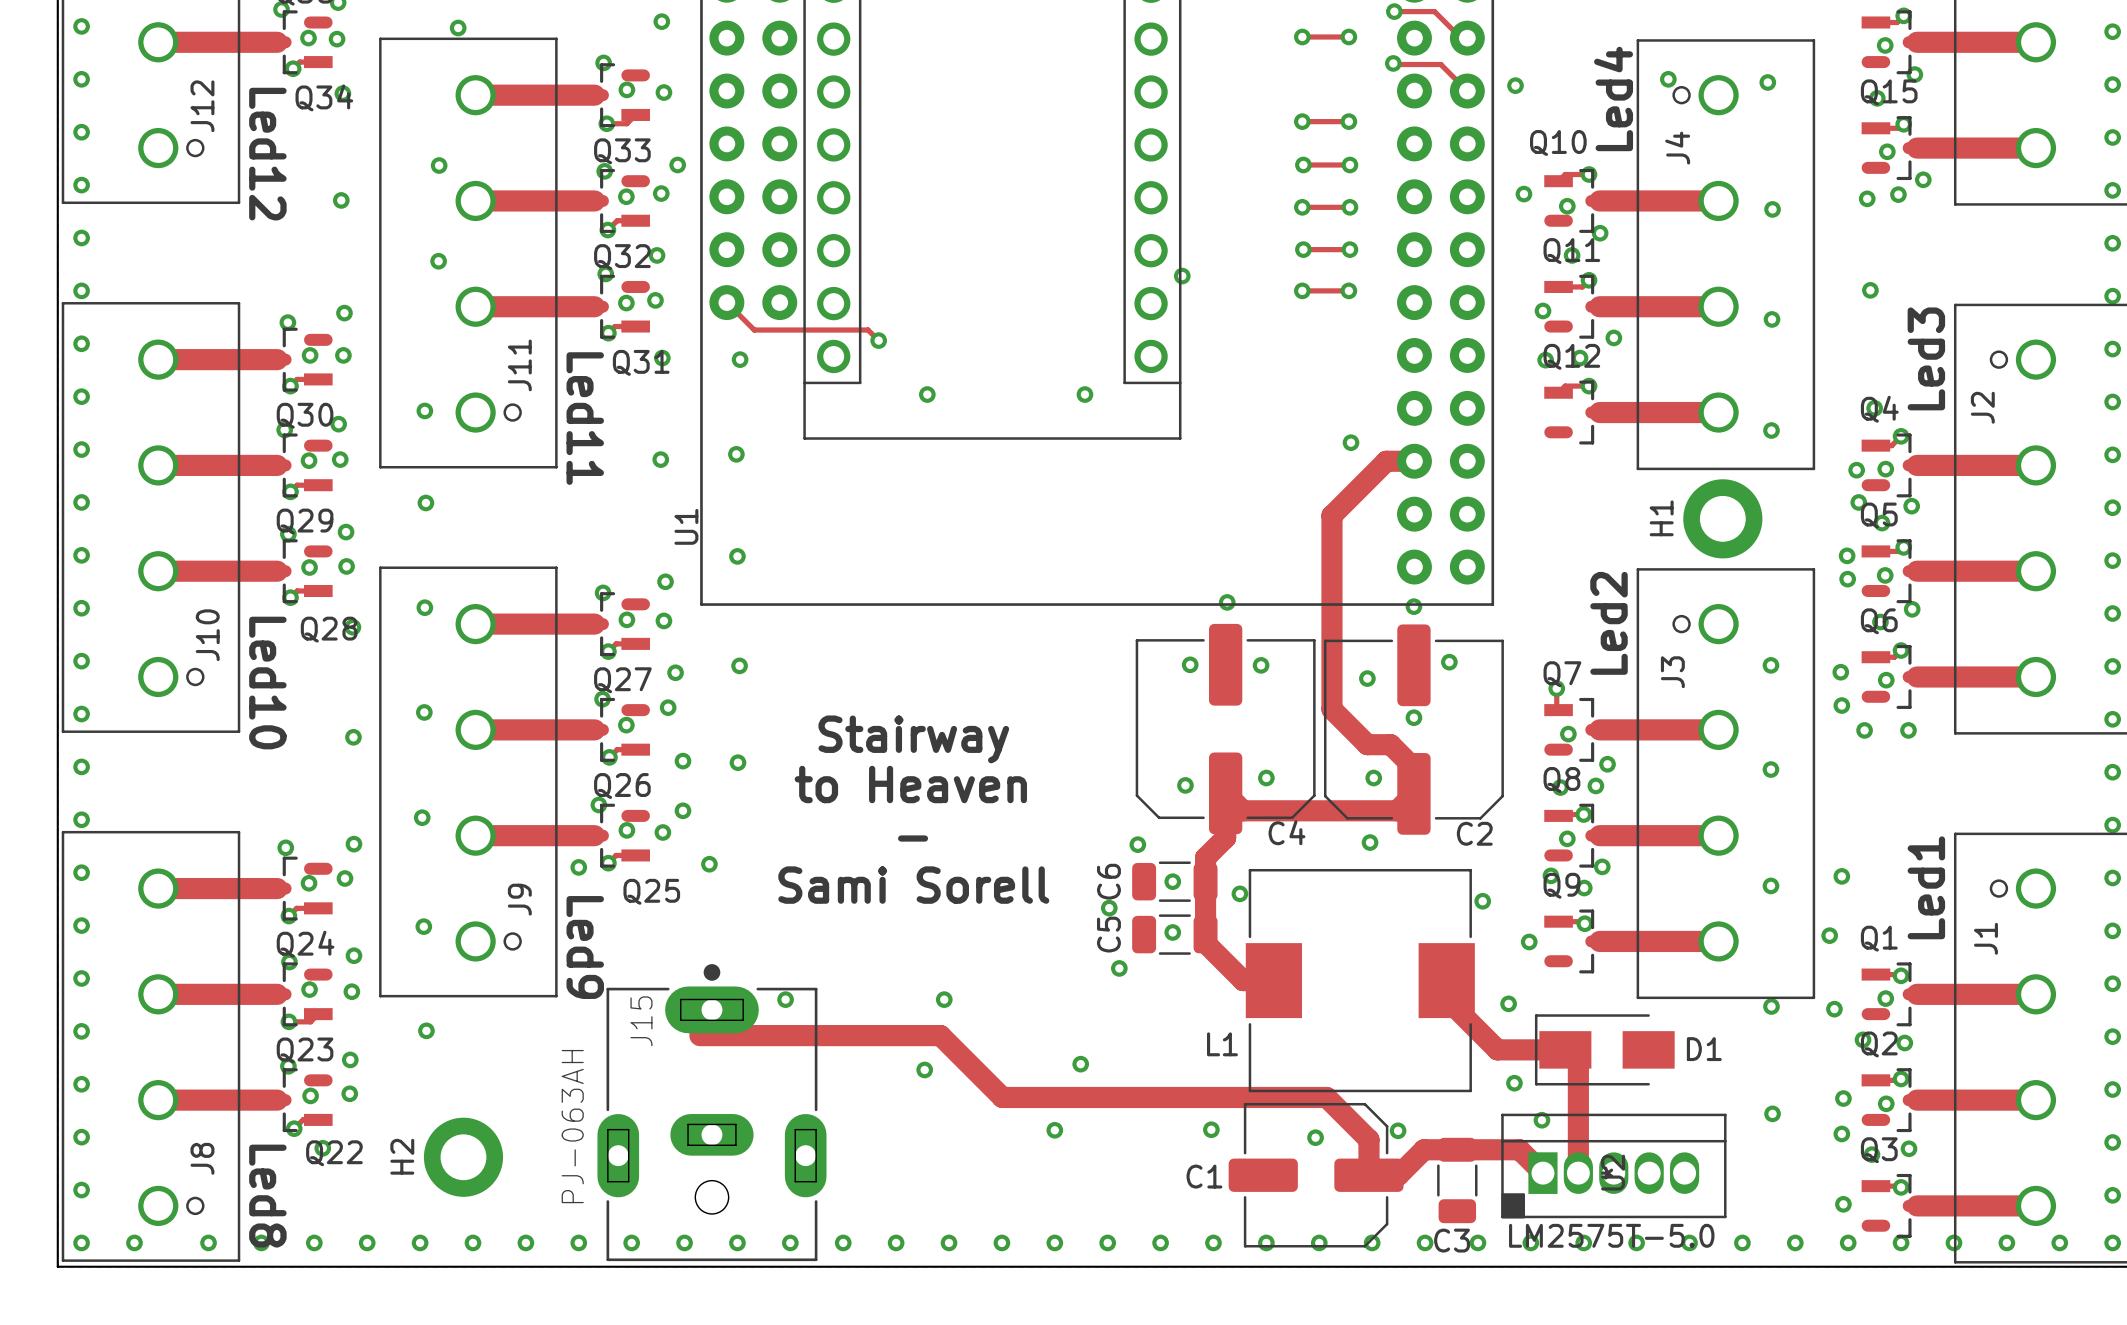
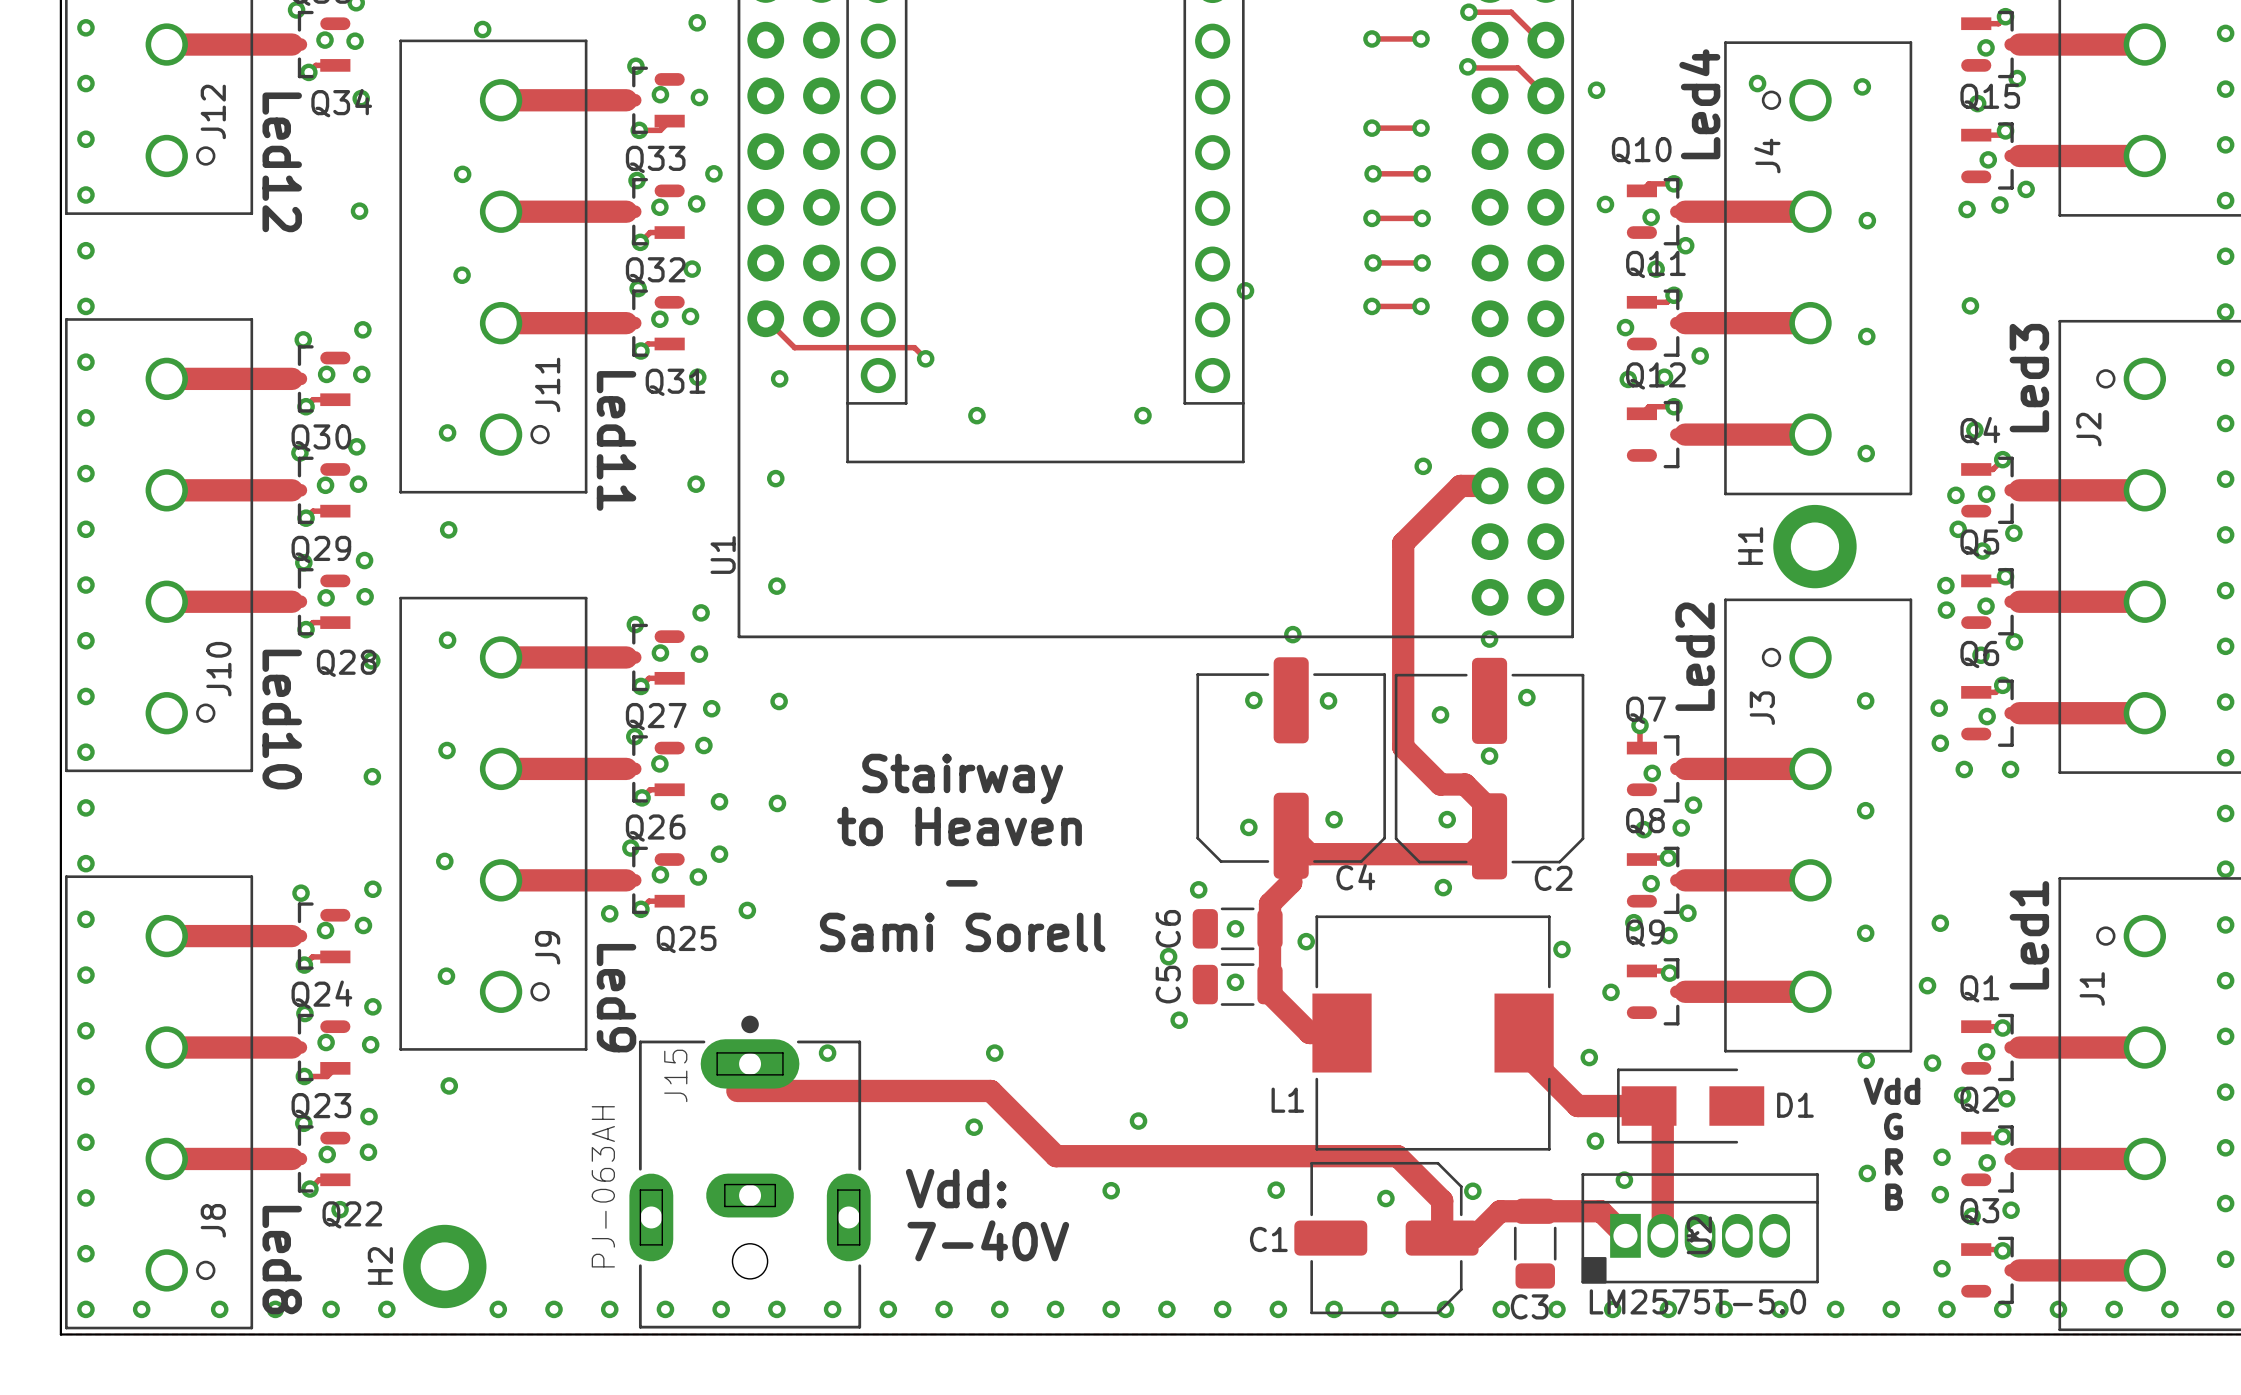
text: none -> Vdd (1891, 1091)
text: none -> G (1893, 1126)
text: none -> R (1894, 1161)
text: none -> Vdd: (956, 1188)
text: none -> B (1894, 1197)
H2 position: (463, 1157) -> (444, 1266)
text: none -> 7-40V (988, 1240)
via: (420, 1242) -> none

